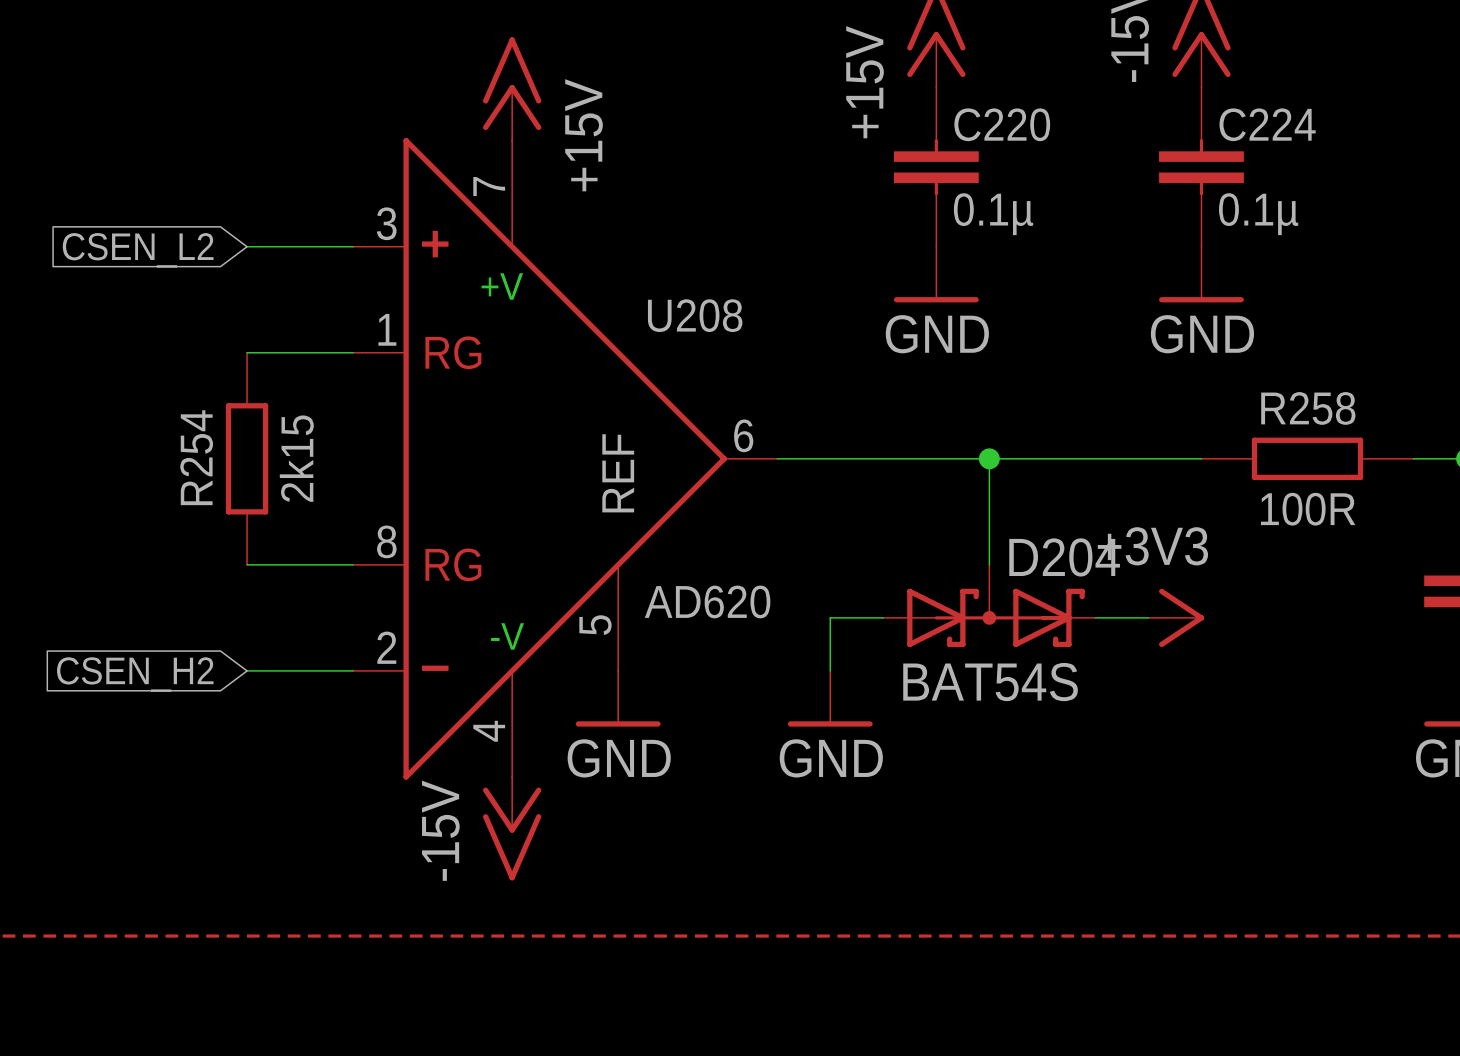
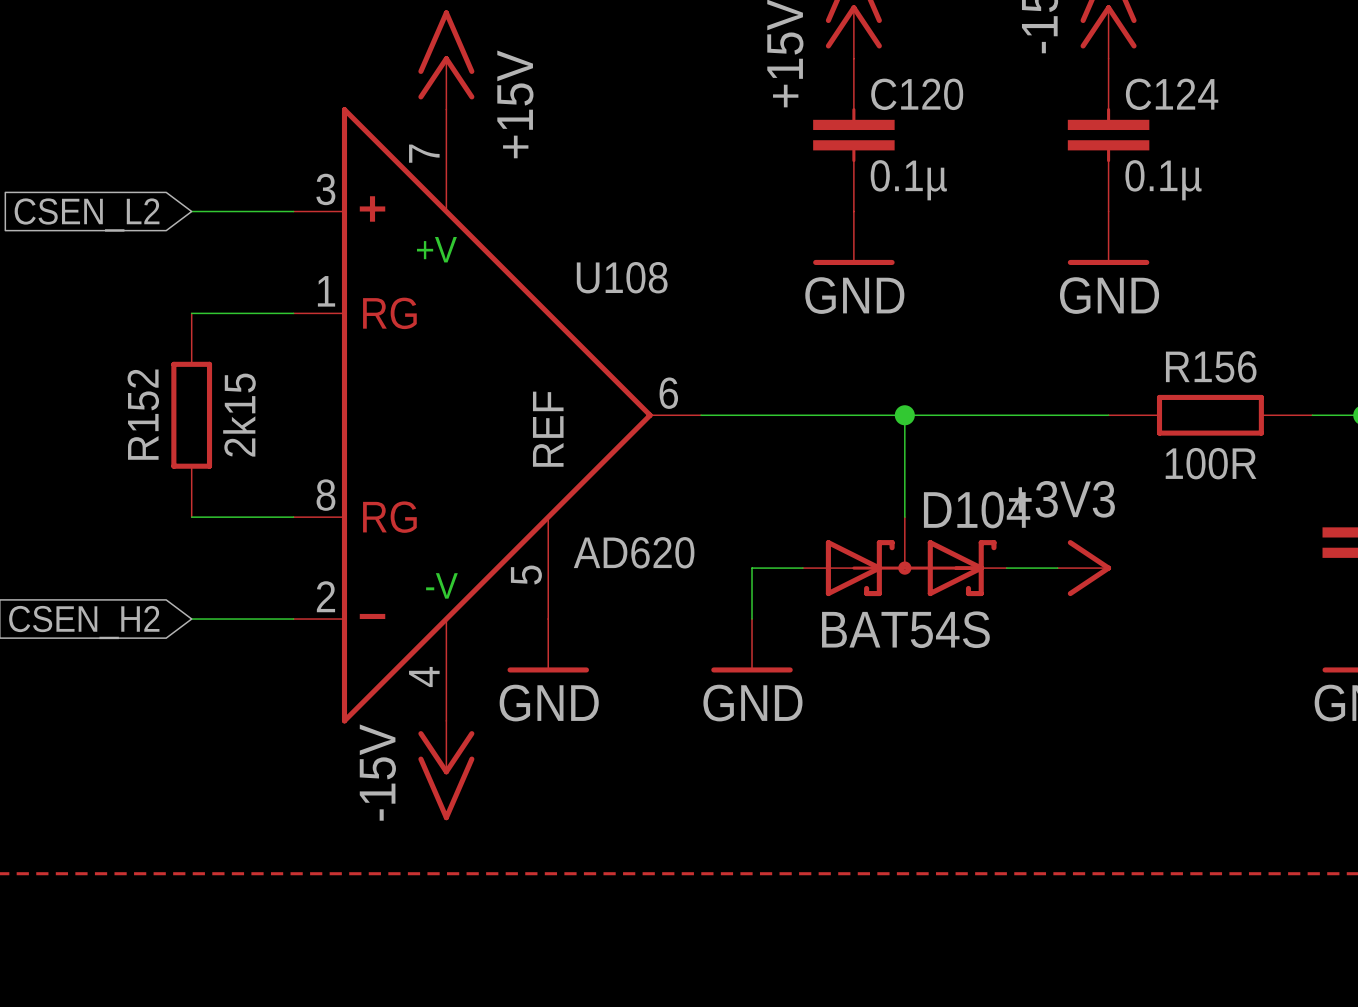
C220 name: C220 (1002, 124) -> C120 (917, 94)
C224 name: C224 (1267, 124) -> C124 (1172, 94)
U208 name: U208 (695, 315) -> U108 (622, 277)
R258 name: R258 (1308, 408) -> R156 (1211, 366)
R254 name: R254 (196, 457) -> R152 (143, 414)
D204 name: D204 (1064, 557) -> D104 (977, 510)

